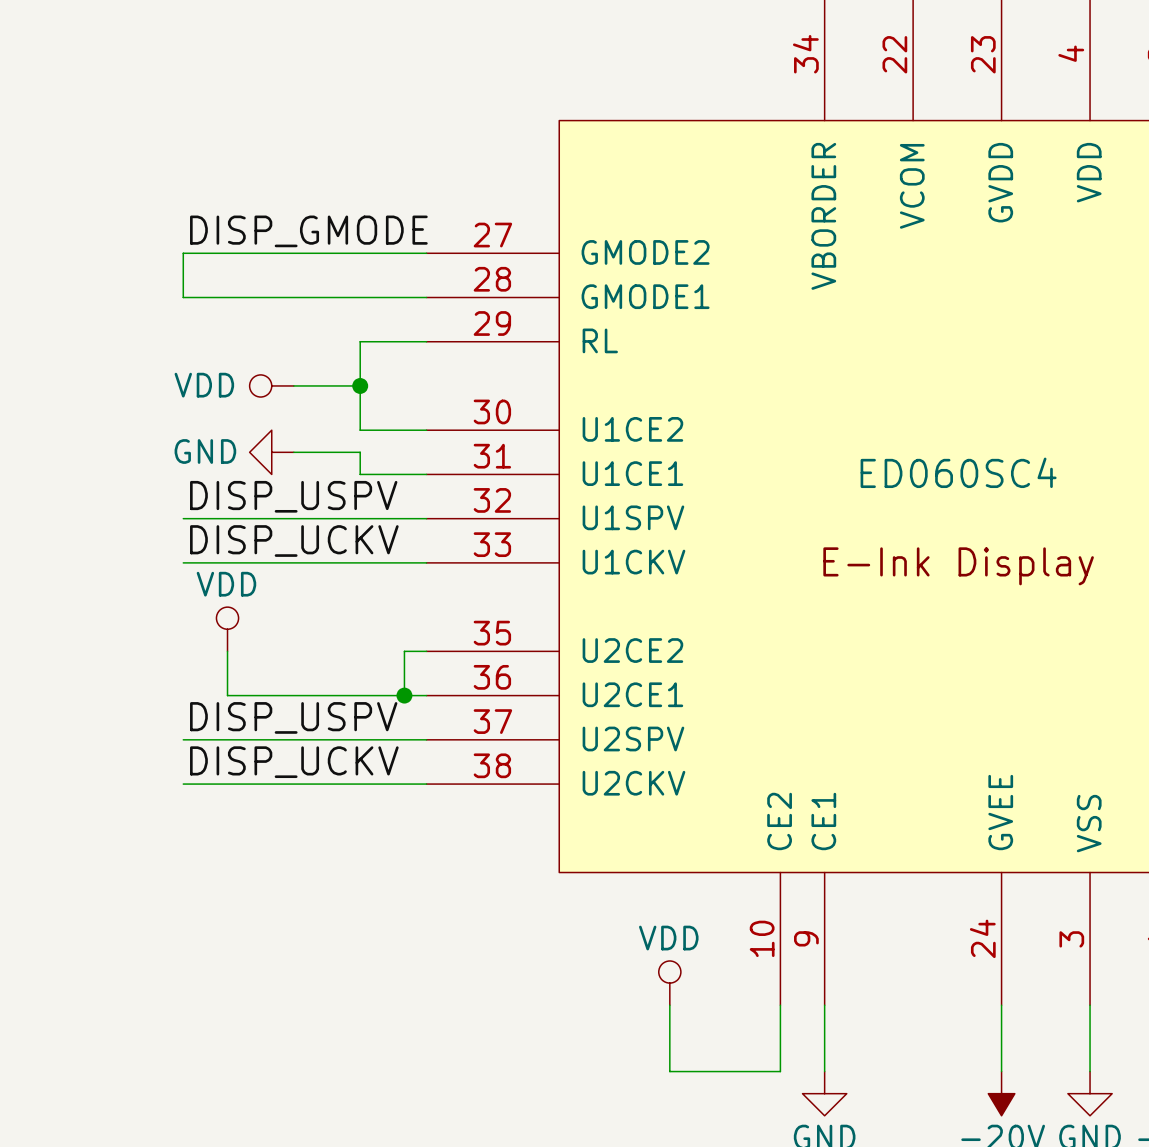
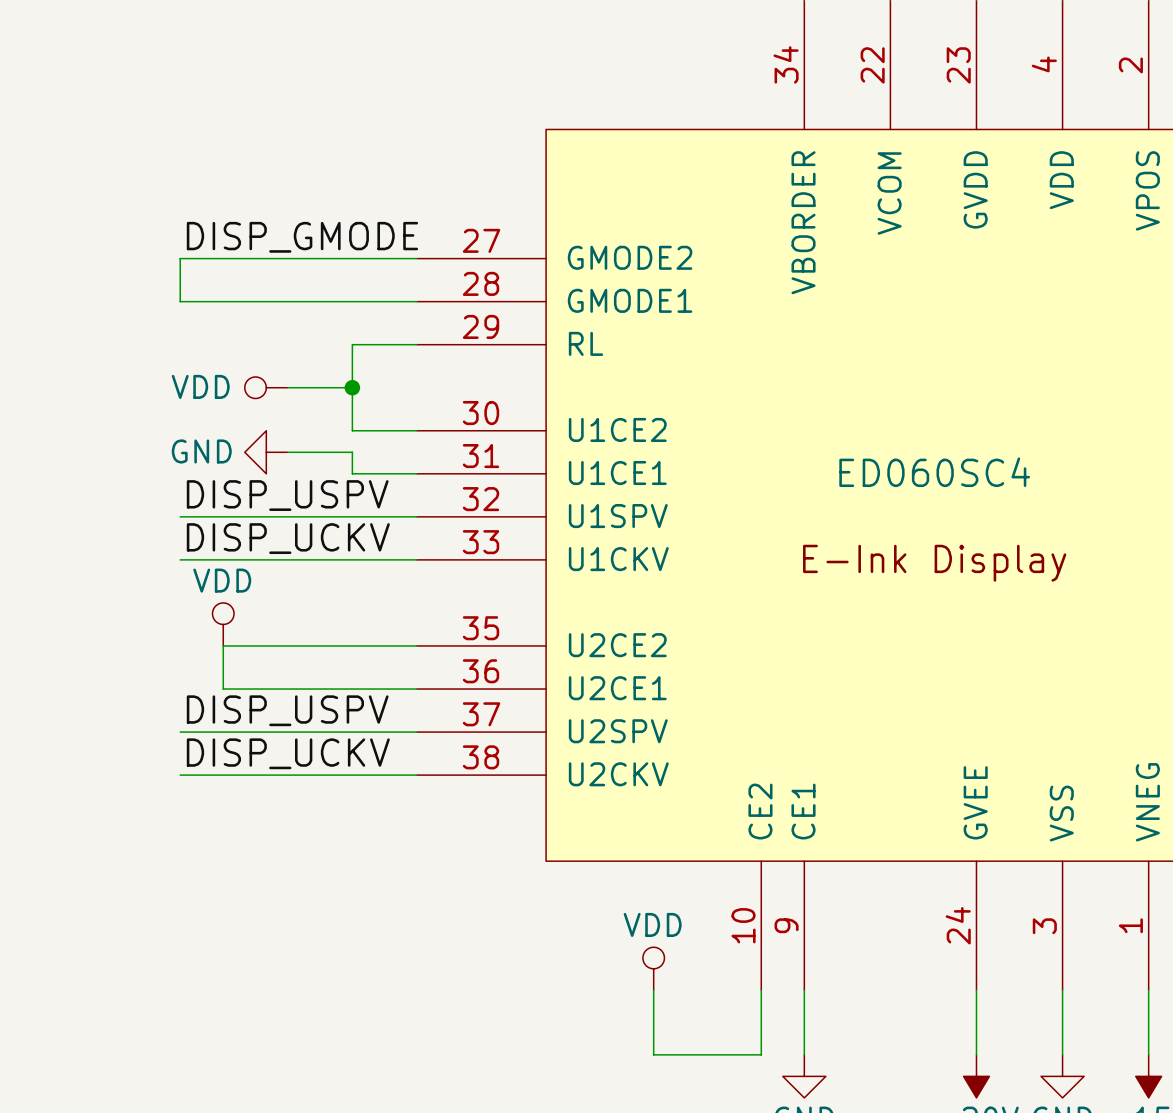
wire: (404, 651) (404, 695) -> (395, 645) (223, 645)
junction: (404, 695) -> none

